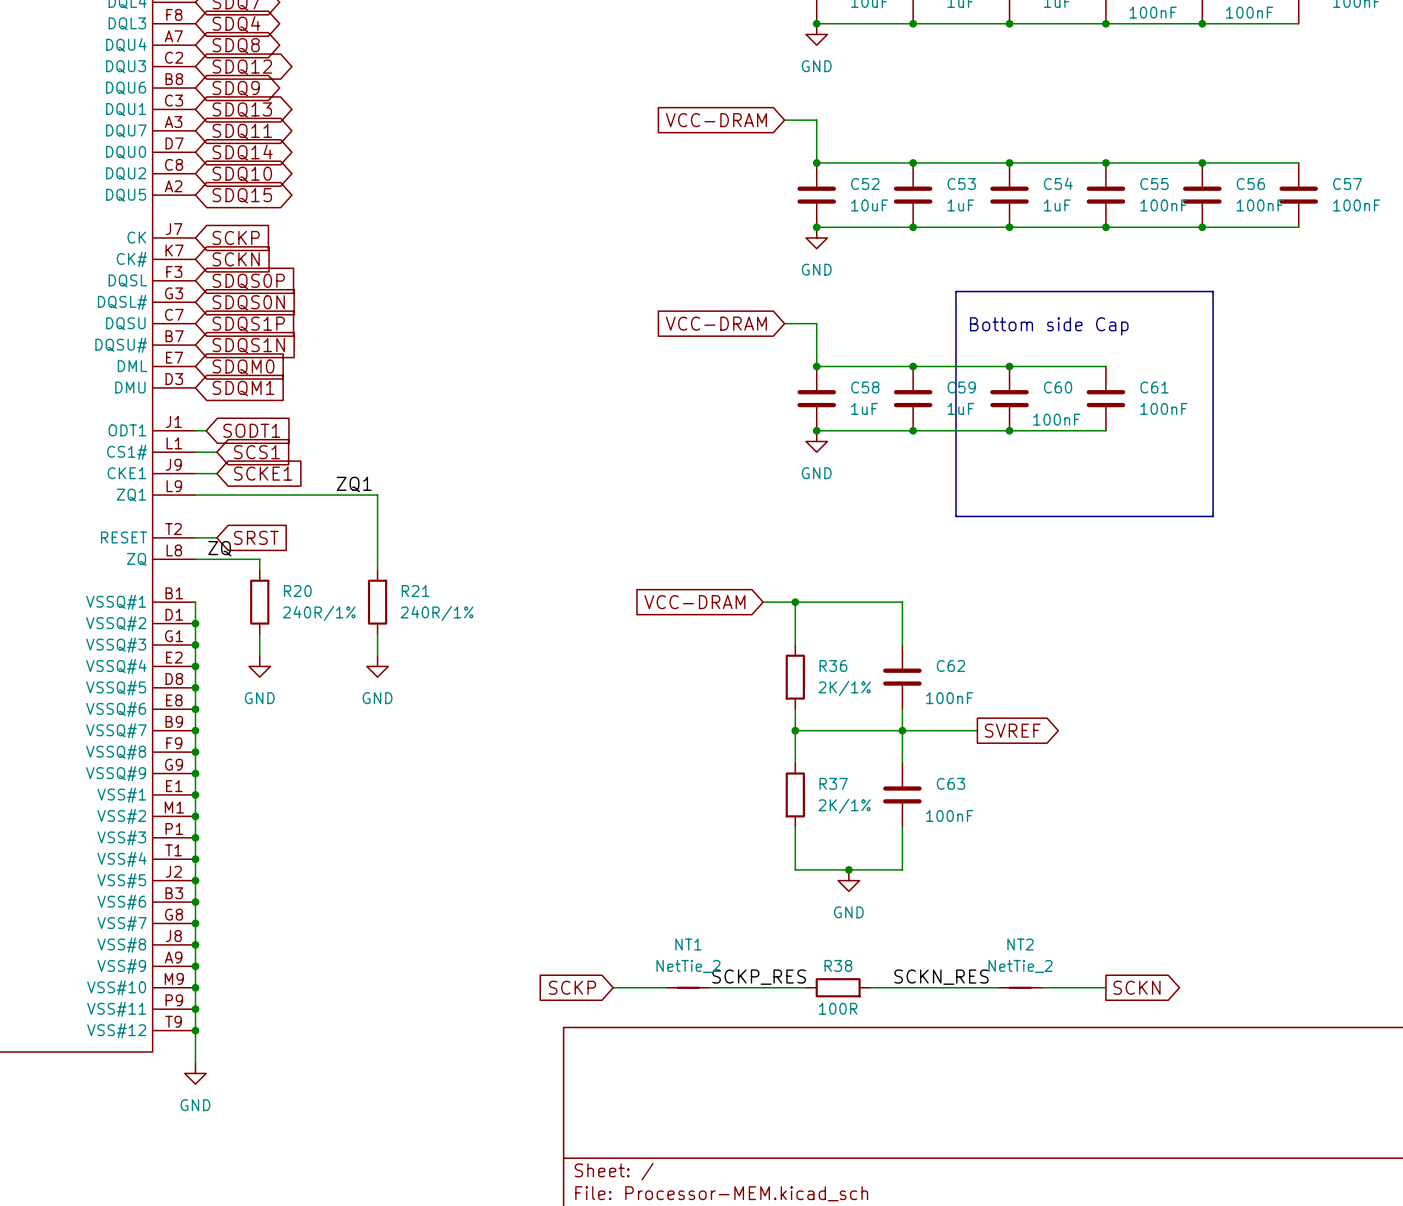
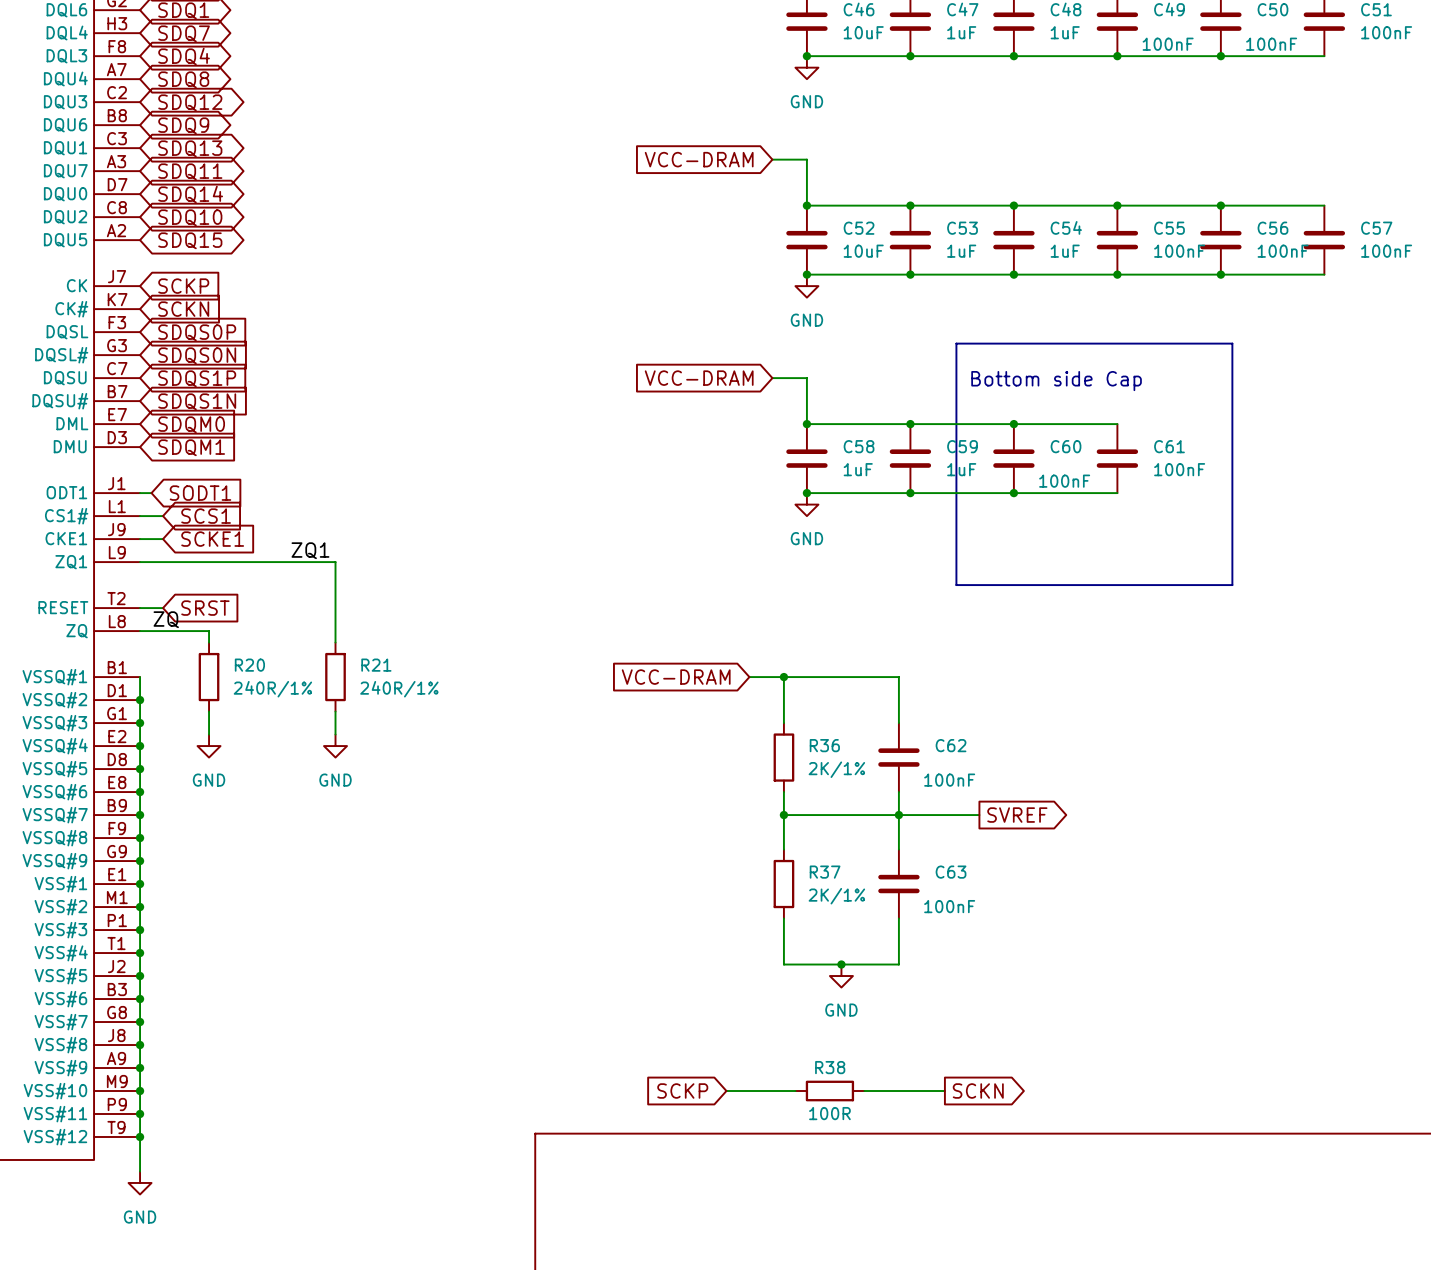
label: SCKP_RES (759, 977) -> none
label: SCKN_RES (941, 977) -> none
global label position: SCKP (572, 987) -> SCKP (682, 1091)
wire: (613, 987) (666, 987) -> none
NT1: NetTie_2 (688, 987) -> none
wire: (709, 987) (741, 987) -> none
wire: (945, 987) (998, 987) -> none
NT2: NetTie_2 (1020, 987) -> none
wire: (1041, 987) (1105, 987) -> none
global label position: SCKN (1136, 987) -> SCKN (978, 1091)

